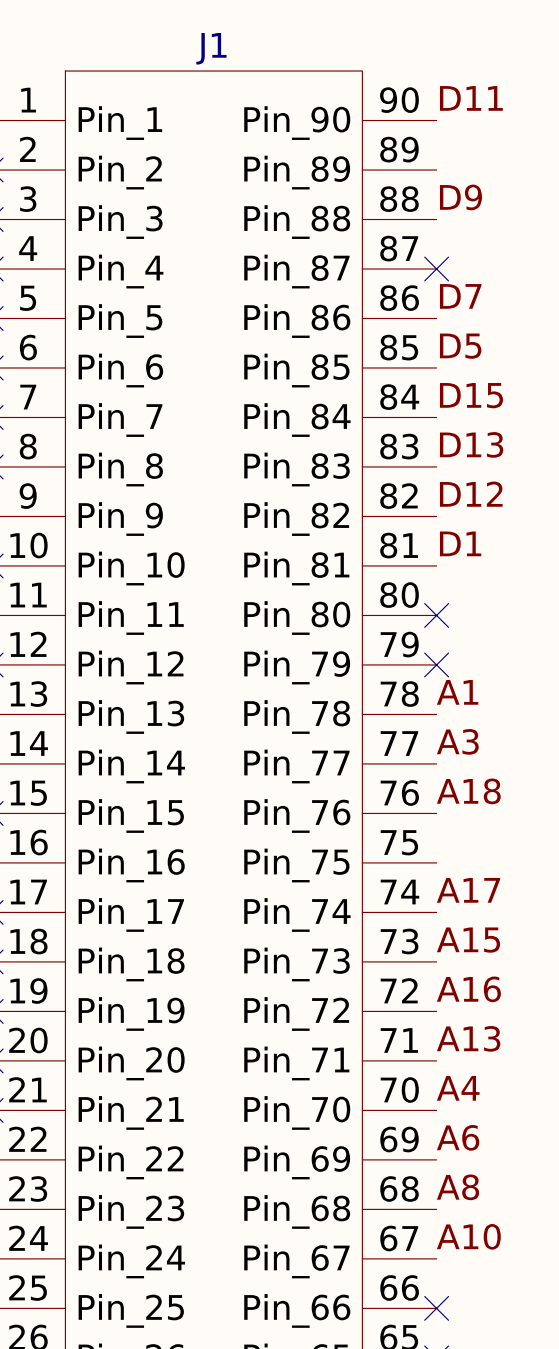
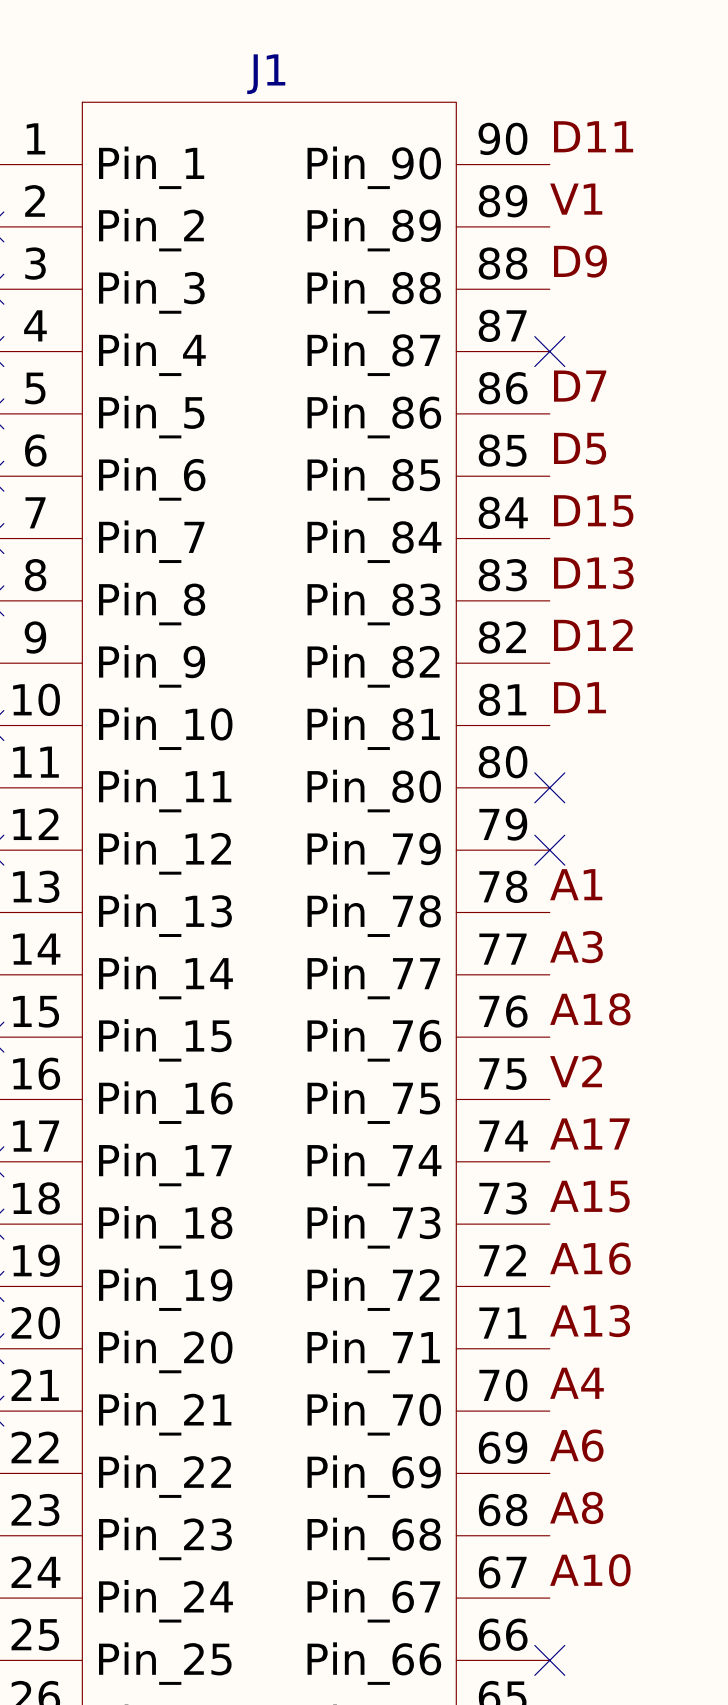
label: none -> V1 (576, 199)
label: none -> V2 (576, 1071)

